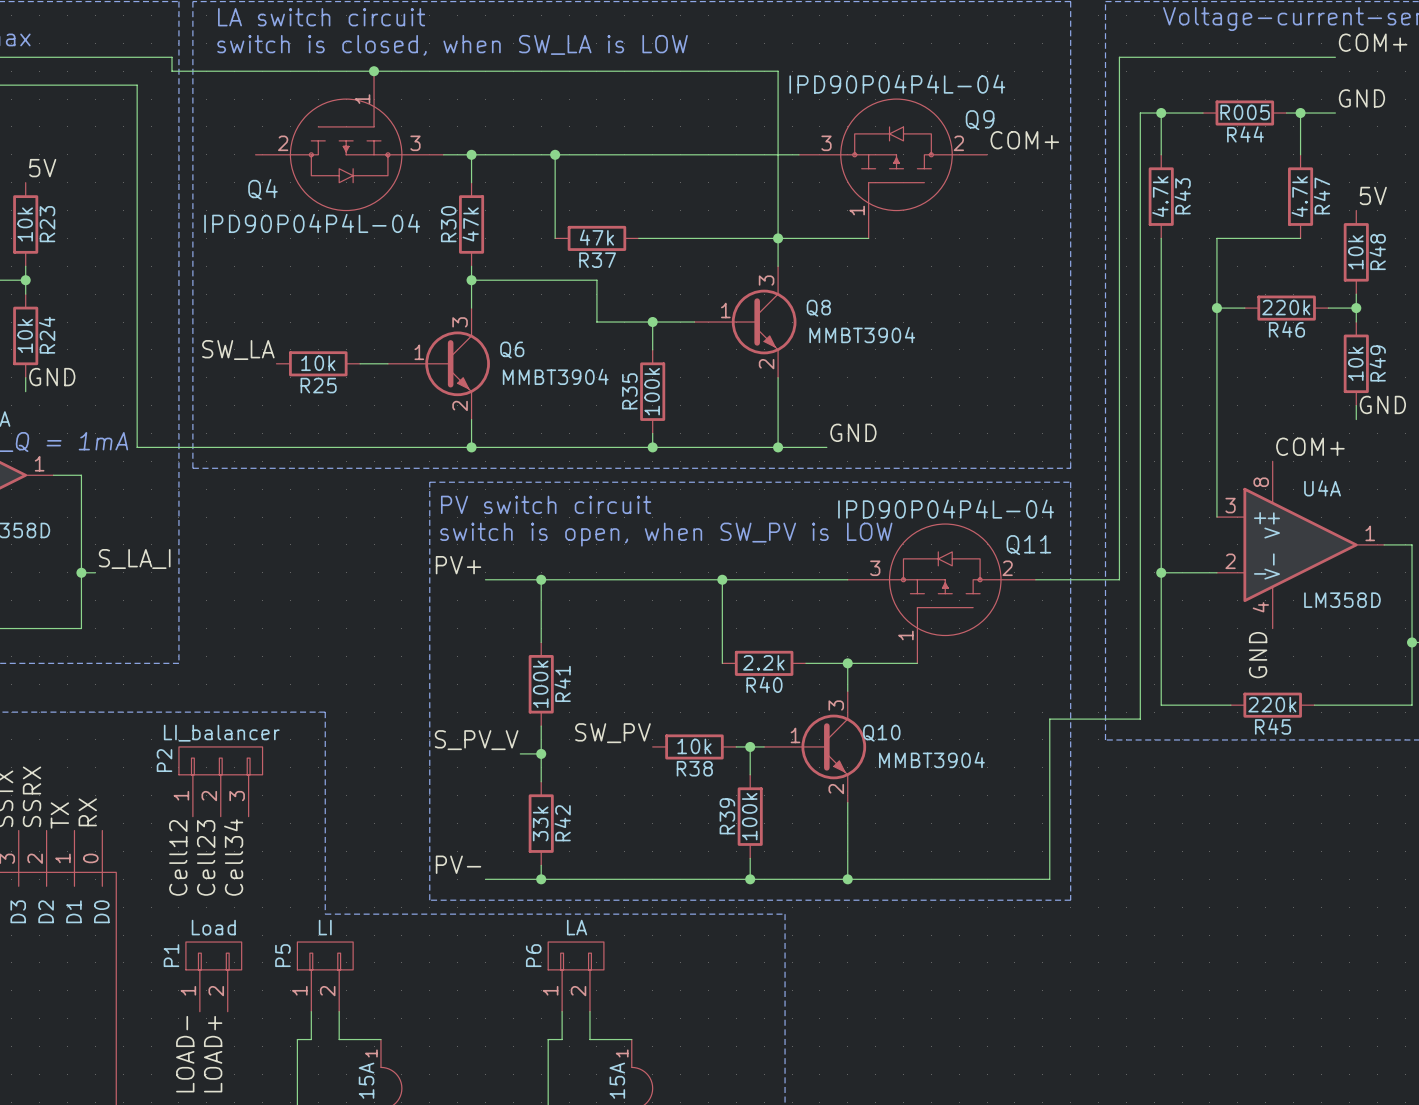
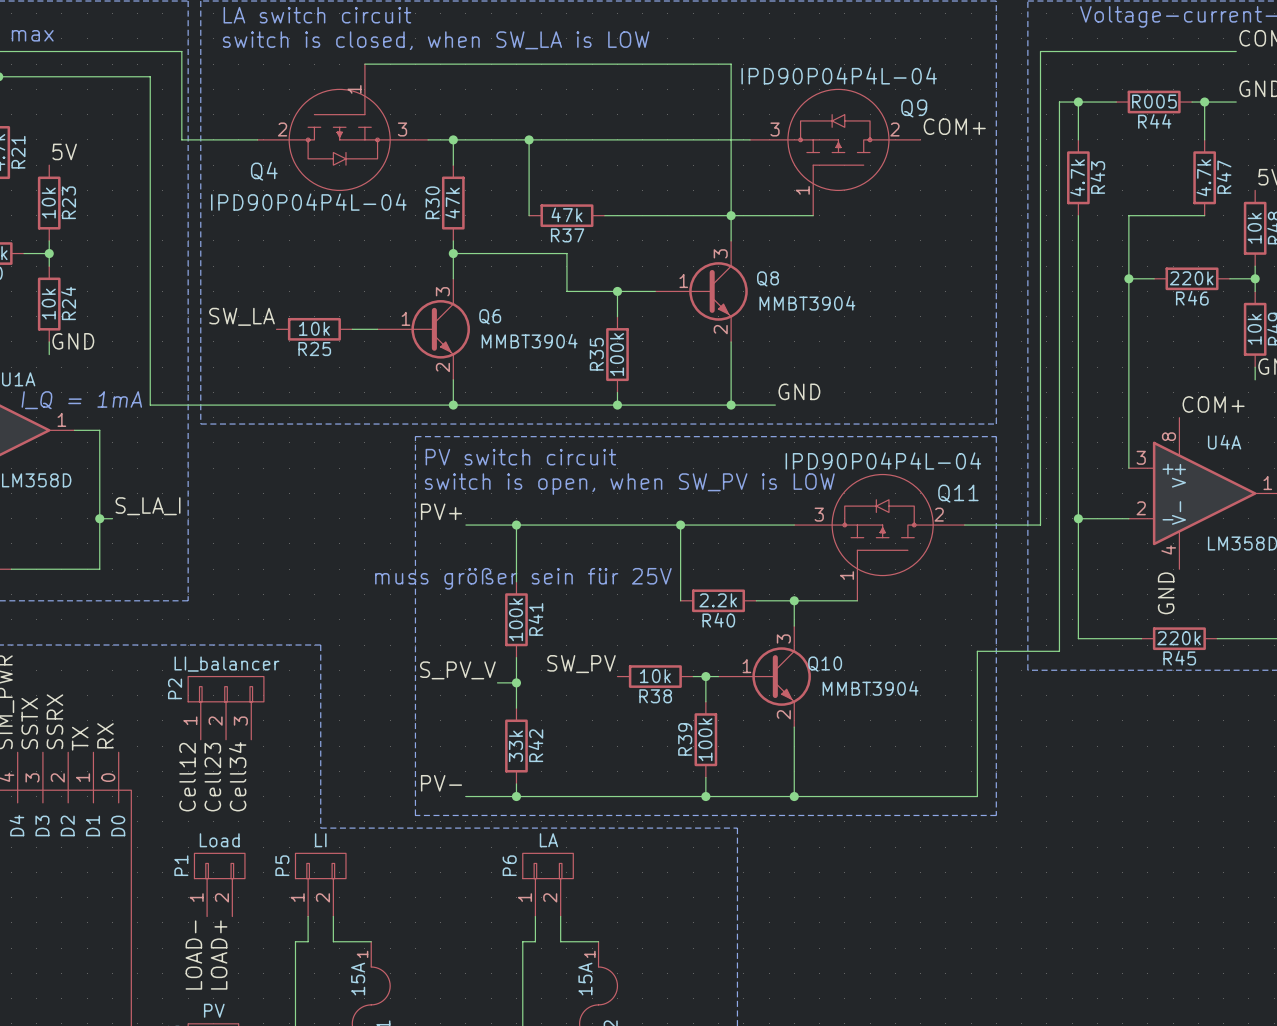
wire: (171, 71) (374, 71) -> (181, 64) (181, 139) (257, 139)
junction: (374, 71) -> none
text: none -> muss größer sein für 25V (523, 578)

